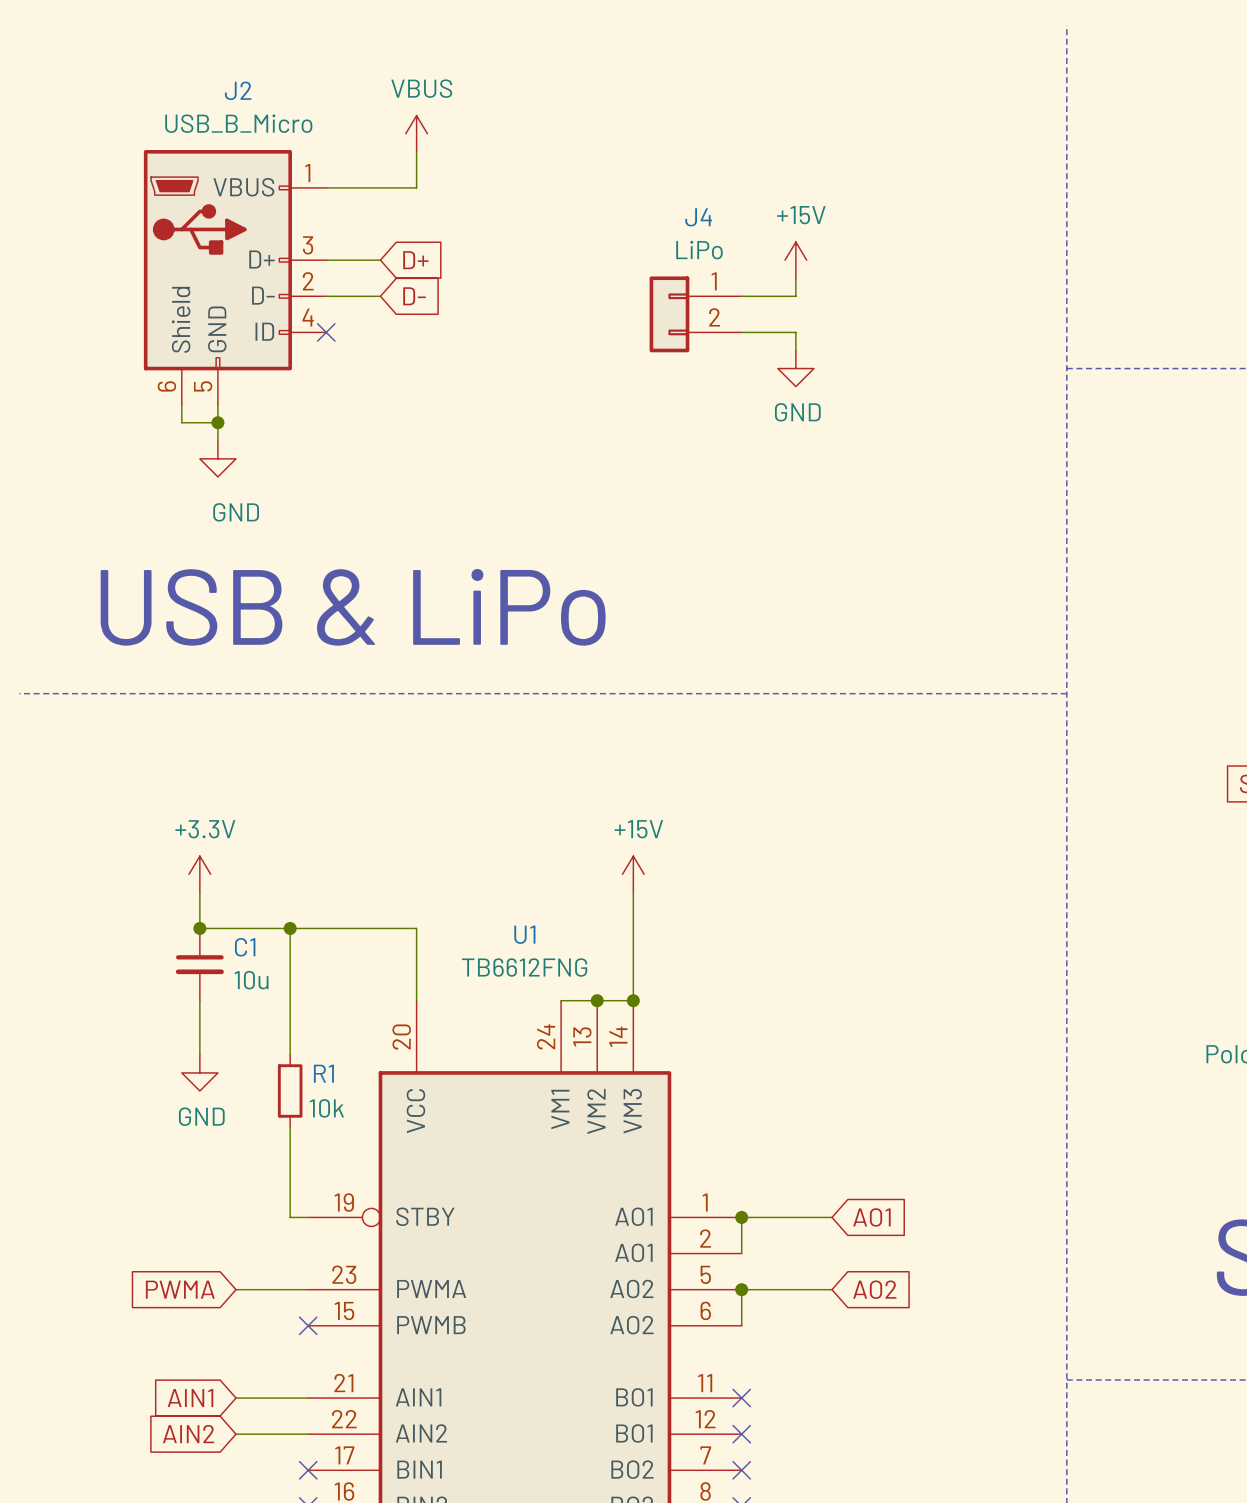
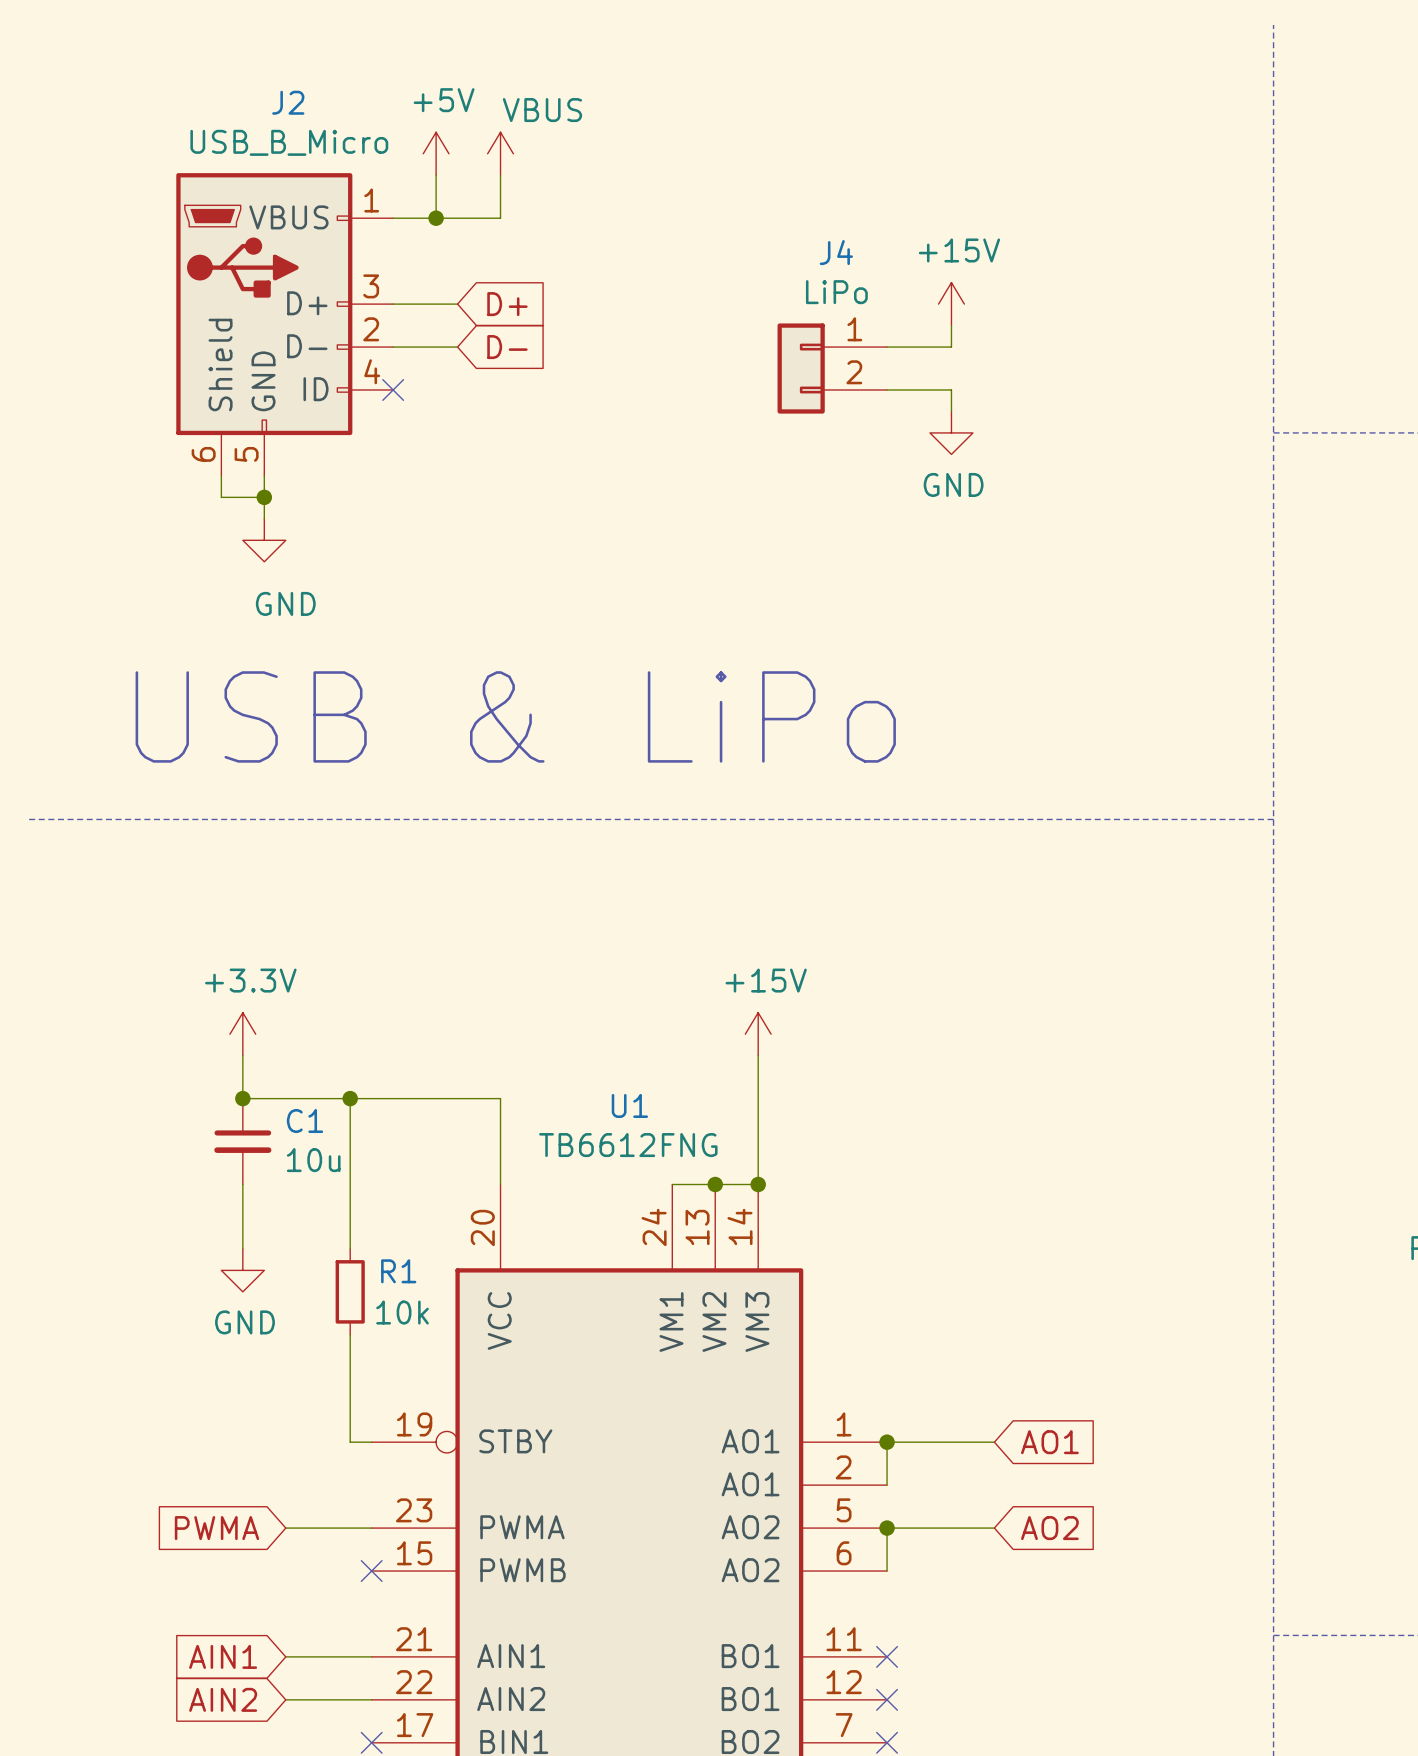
power symbol text position: VBUS (421, 88) -> VBUS (542, 110)
power symbol: none -> +5V (436, 153)
wire: none -> (436, 175) (436, 218)
junction: none -> (436, 218)

